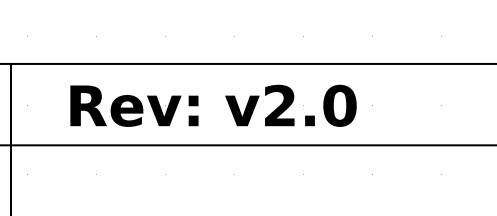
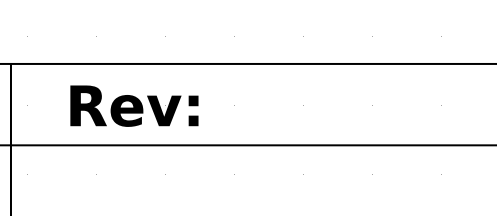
title block: Rev: v2.0 (213, 105) -> Rev: (134, 106)

